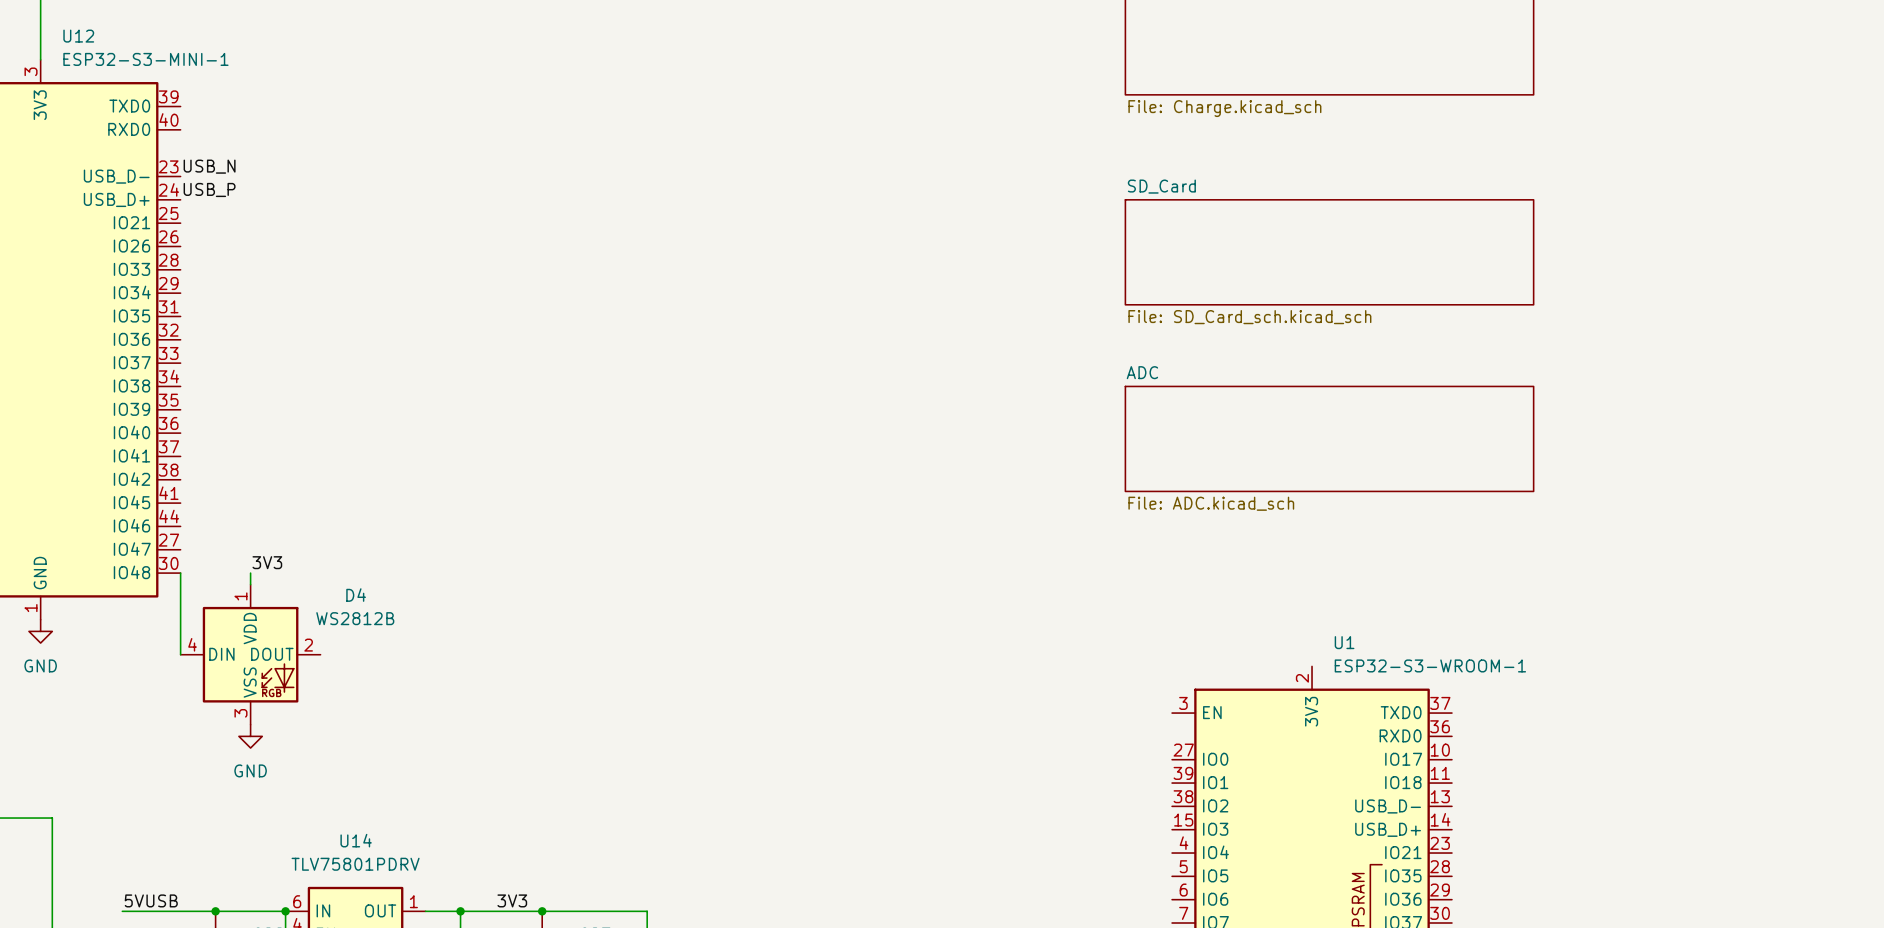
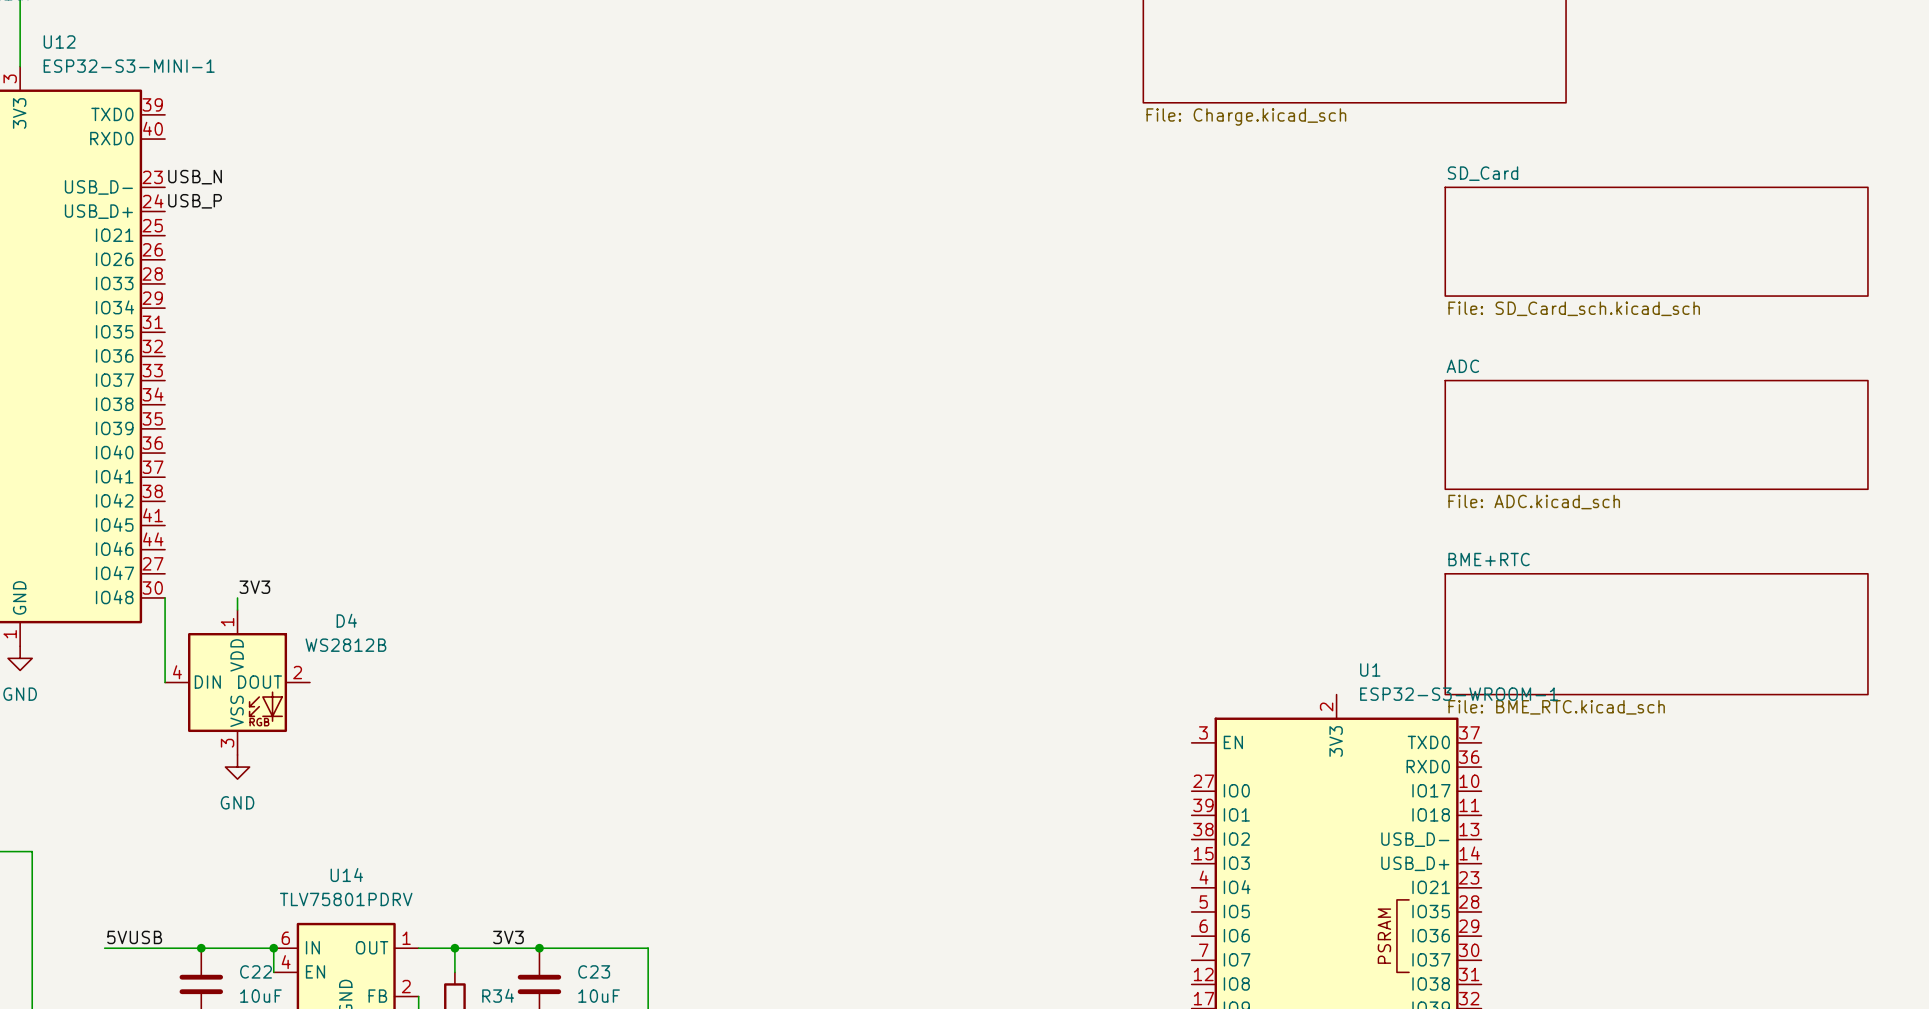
sheet SD_Card: none -> File: SD_Card_sch.kicad_sch (1656, 241)
sheet SD_Card: File: SD_Card_sch.kicad_sch (1329, 252) -> none
sheet ADC: none -> File: ADC.kicad_sch (1656, 434)
sheet ADC: File: ADC.kicad_sch (1329, 438) -> none
sheet BME+RTC: none -> File: BME_RTC.kicad_sch (1656, 634)

